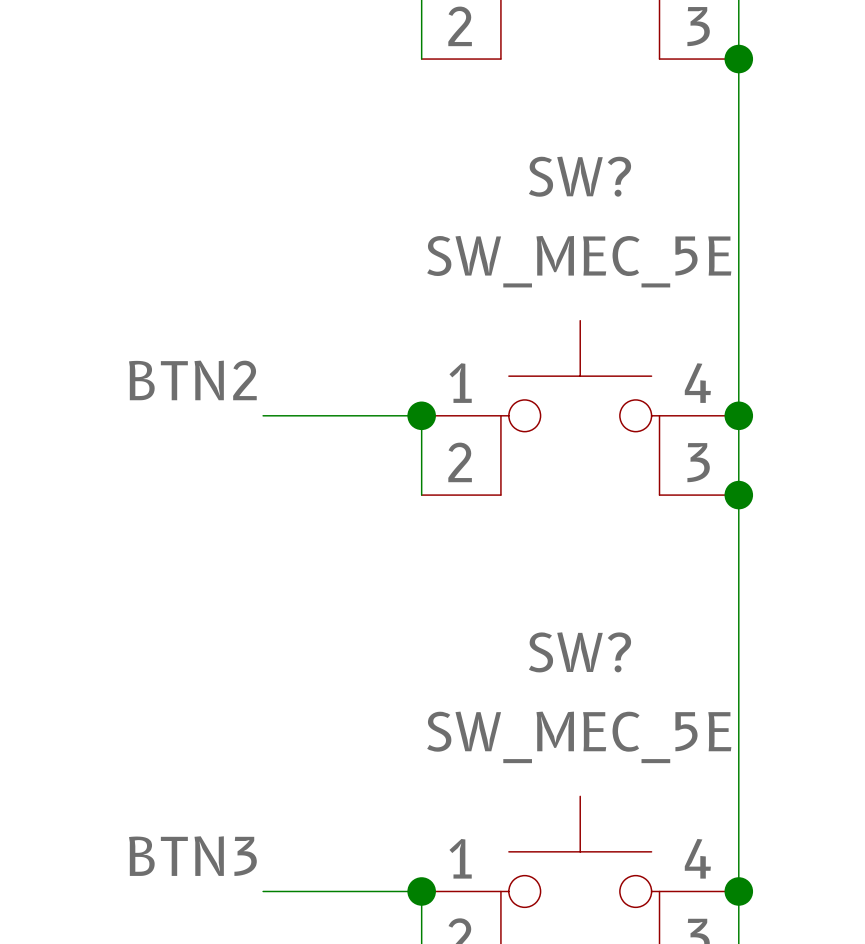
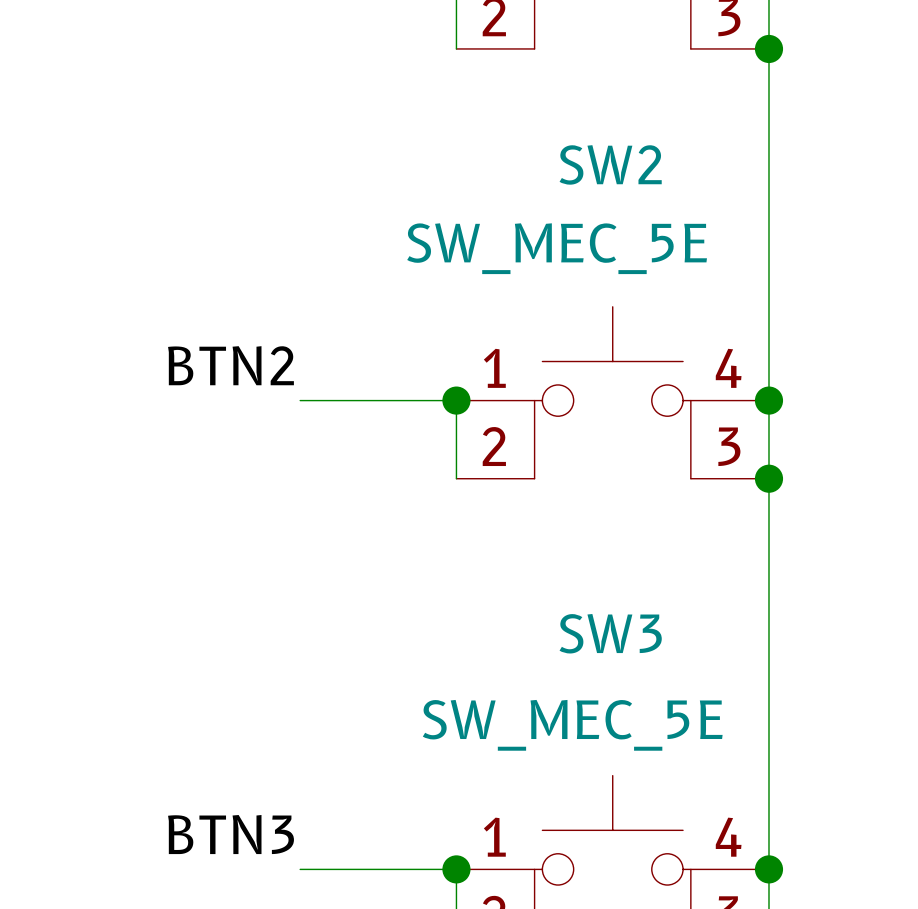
SW? name: SW? (579, 176) -> SW2 (610, 164)
SW? value position: SW_MEC_5E (579, 261) -> SW_MEC_5E (557, 248)
SW? name: SW? (579, 652) -> SW3 (610, 633)
SW? value position: SW_MEC_5E (579, 737) -> SW_MEC_5E (572, 725)

